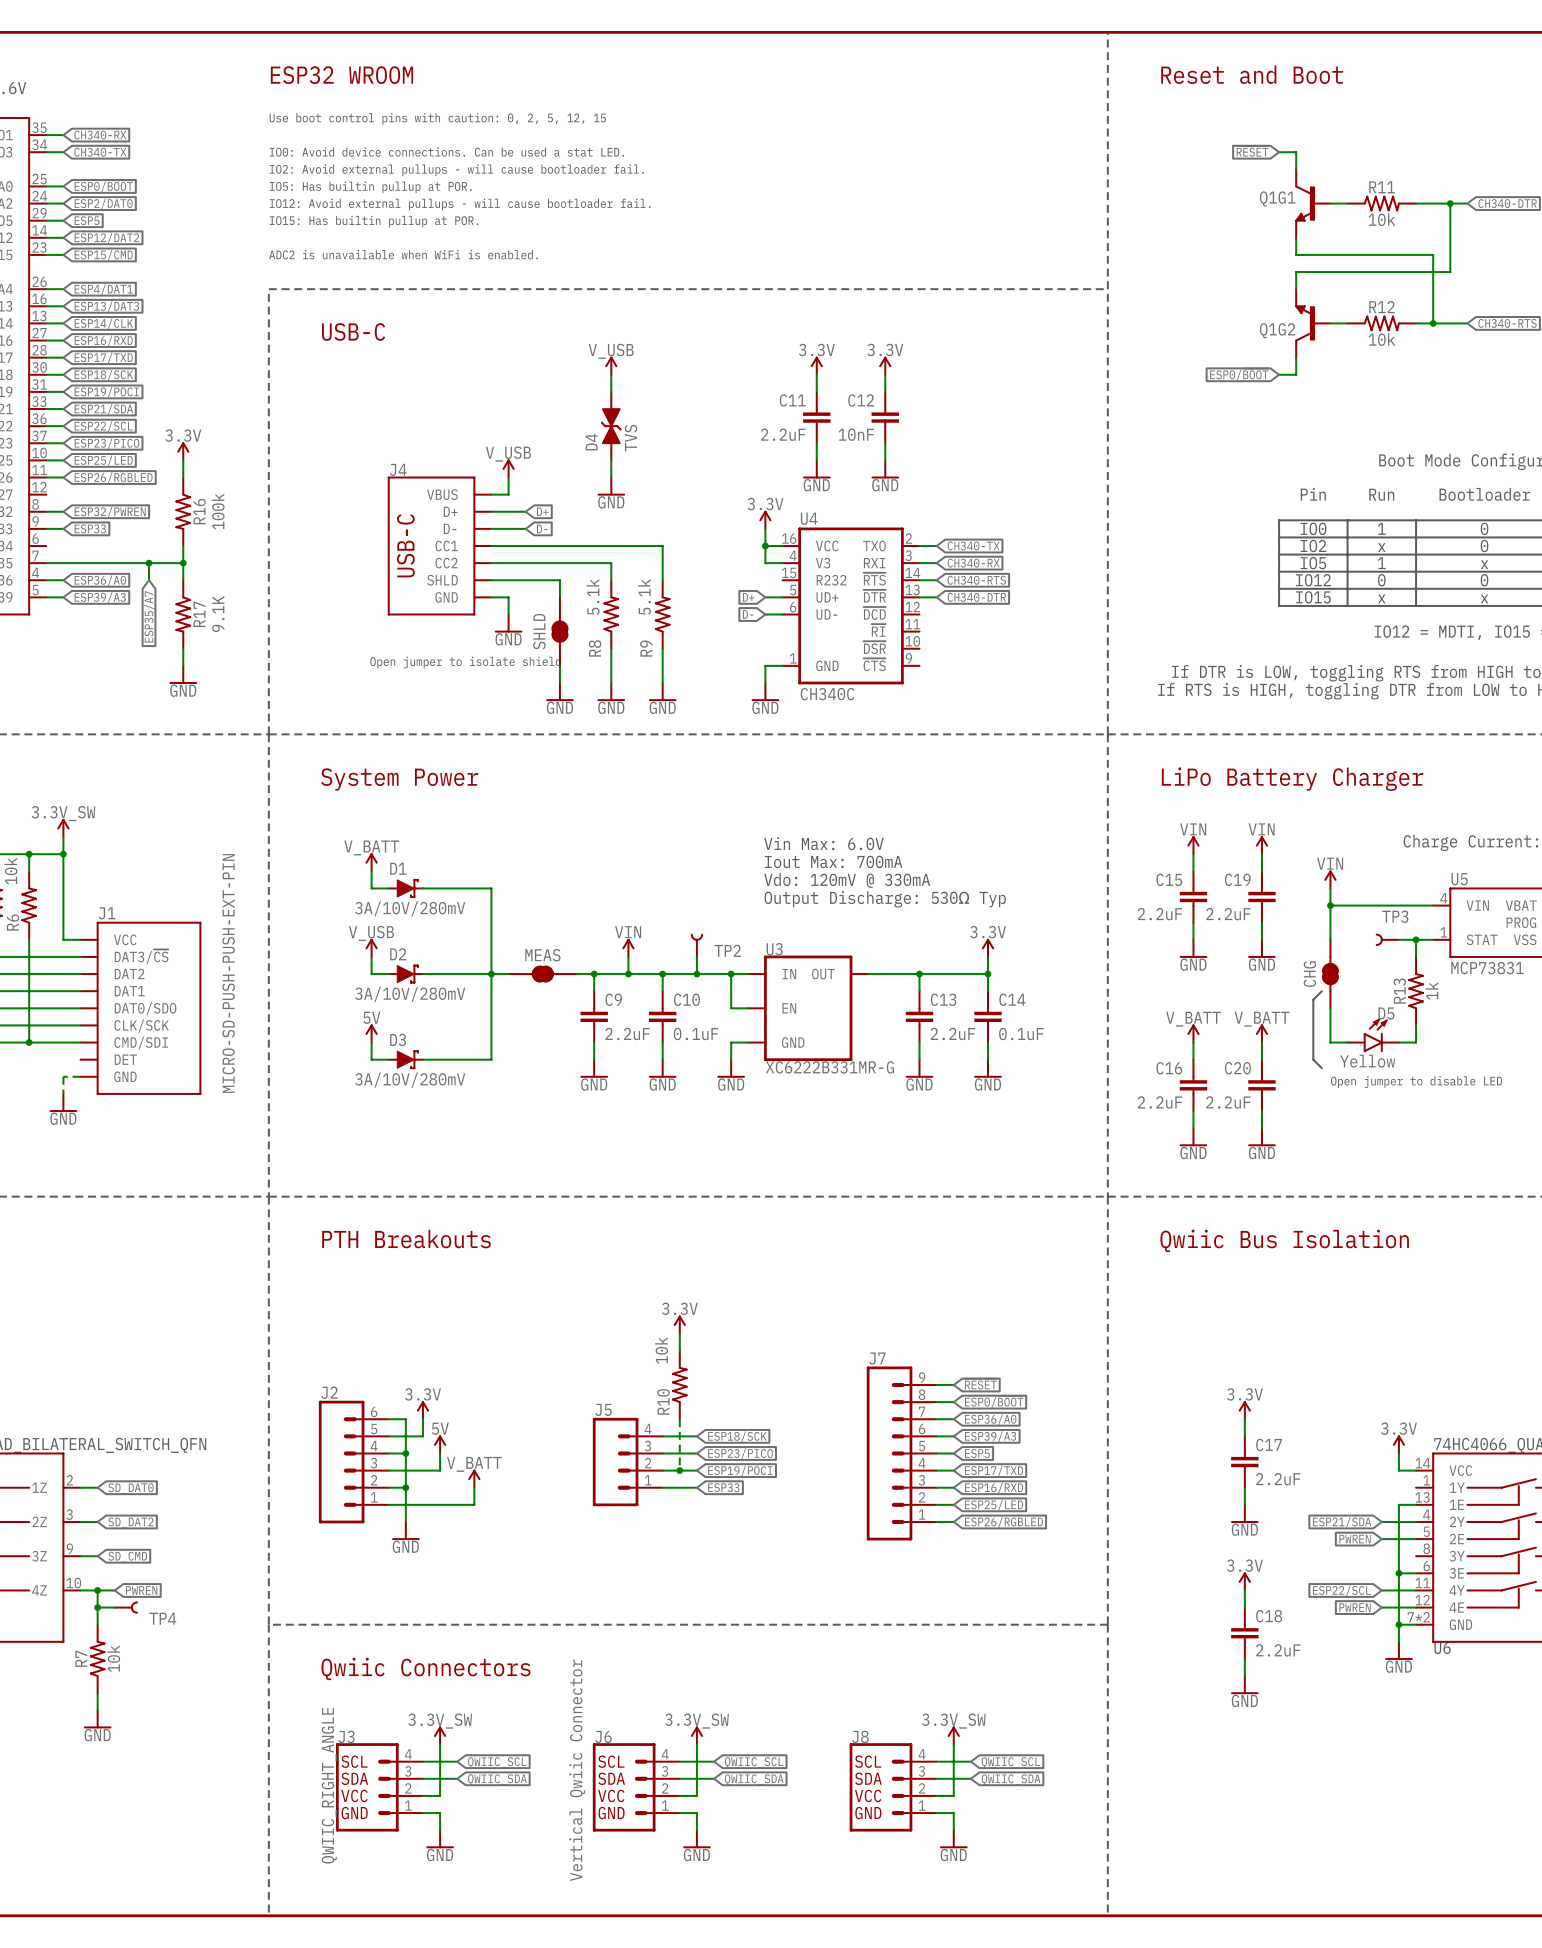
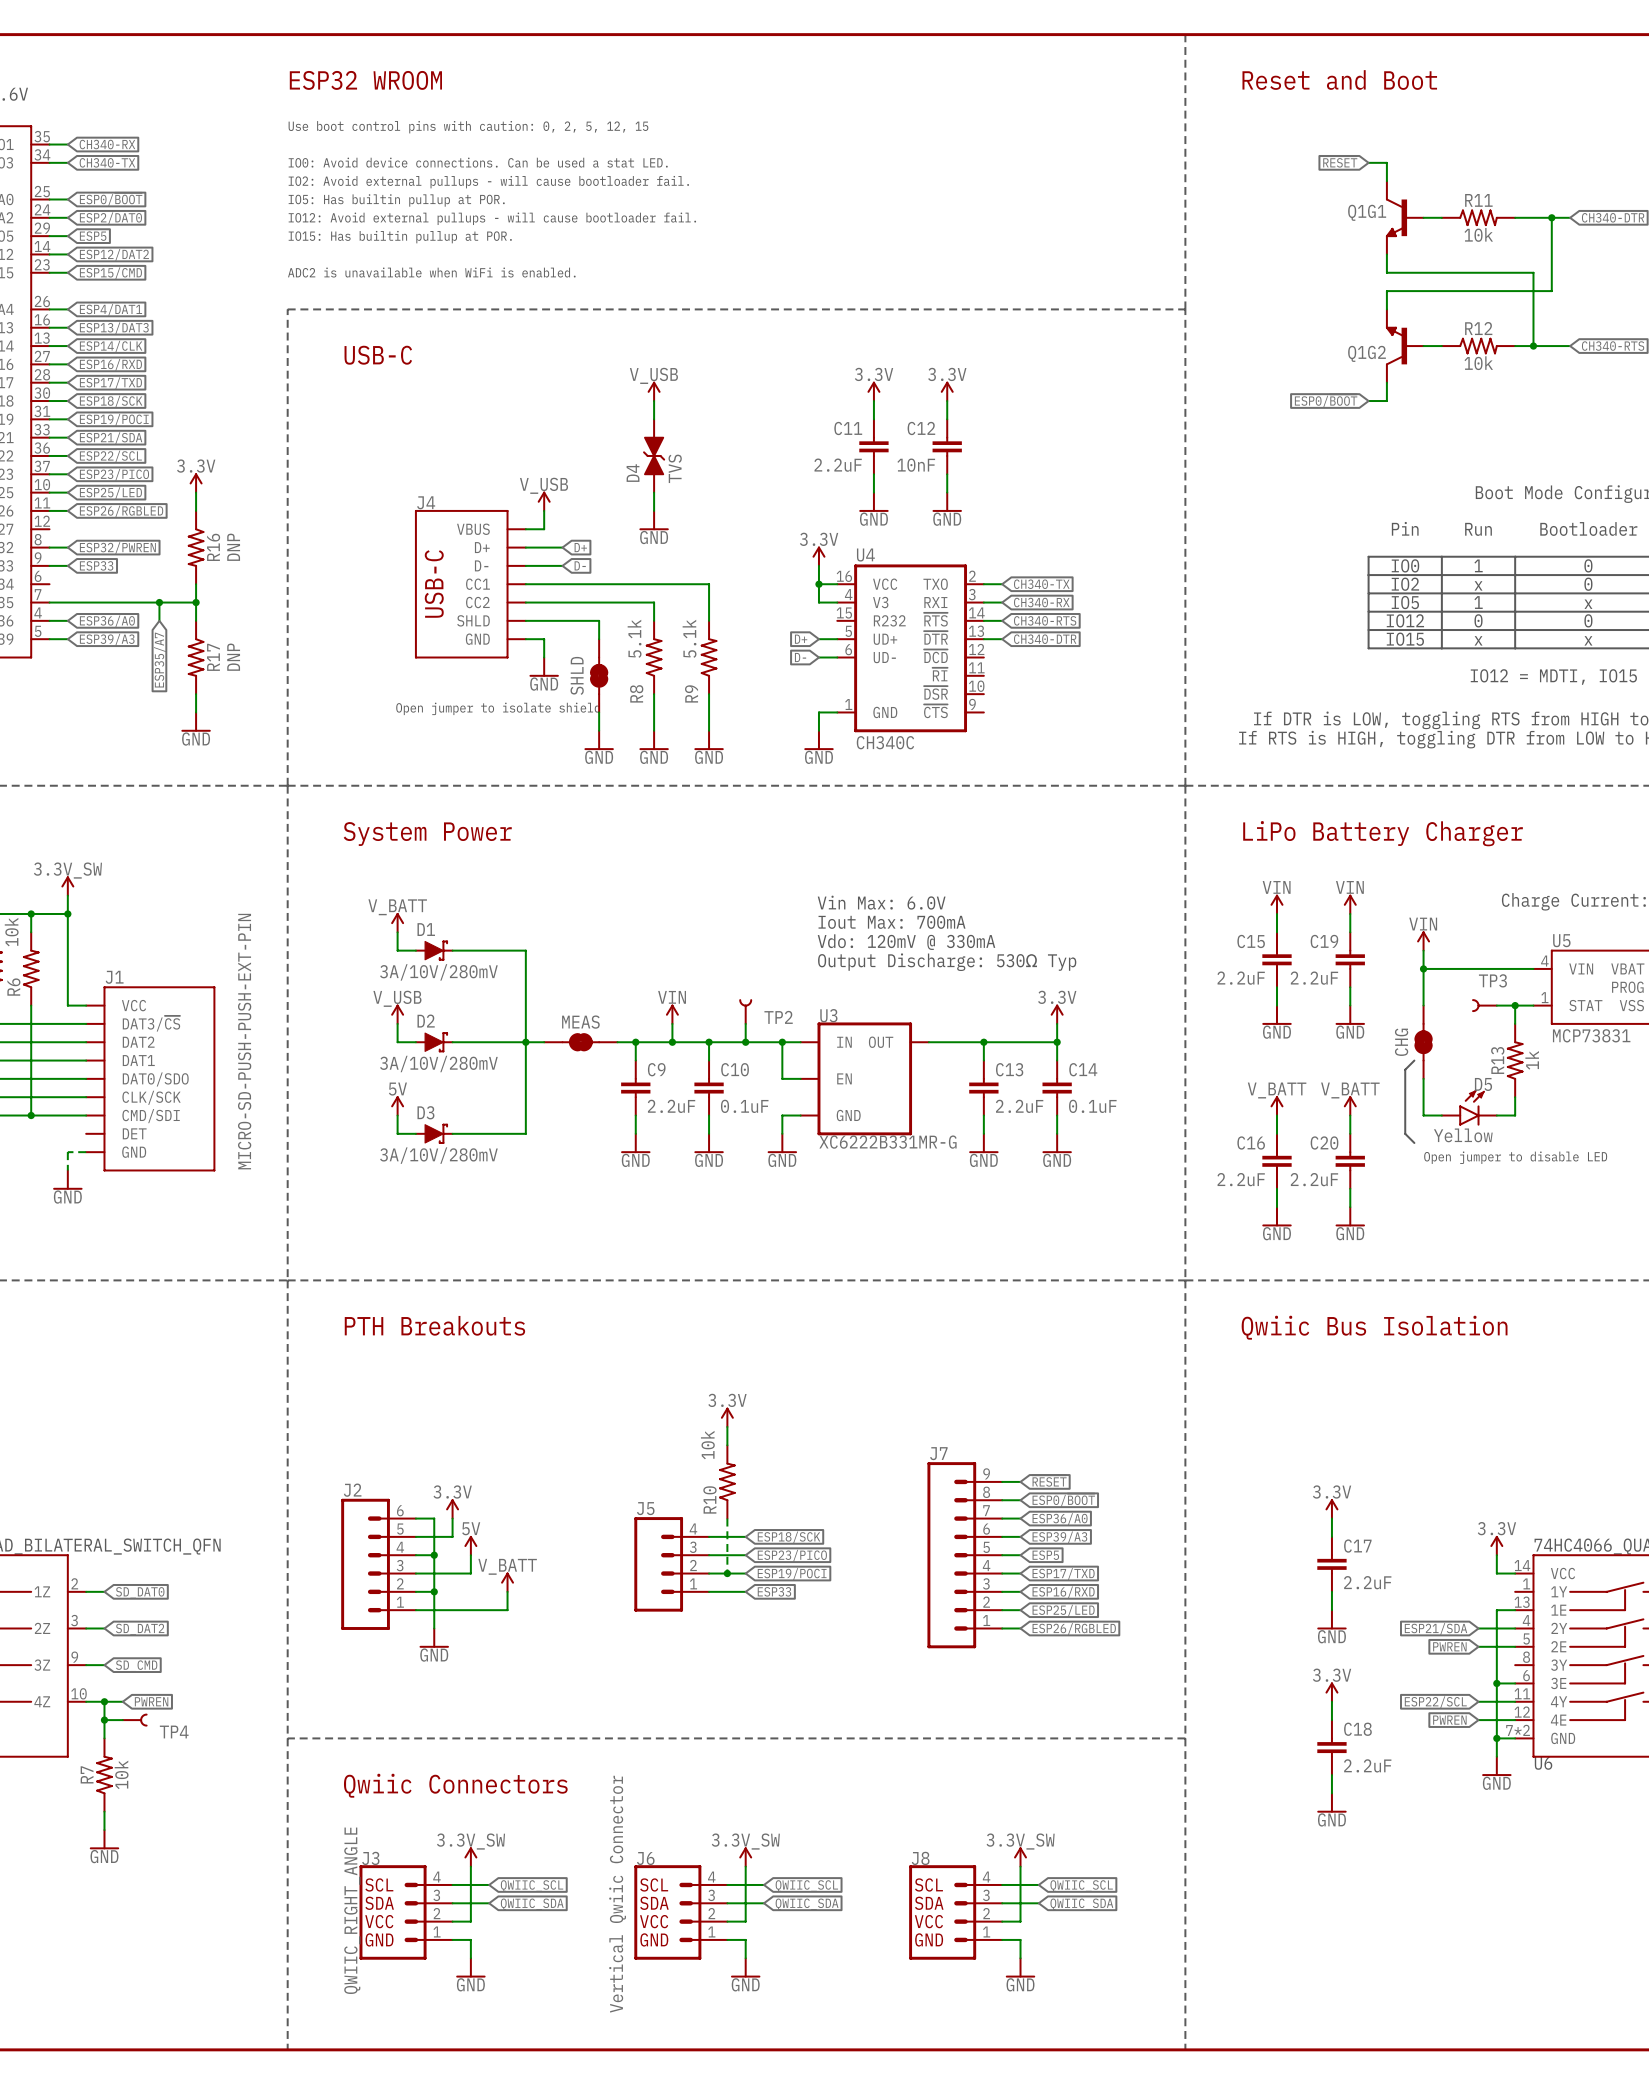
R16 value: 100k (218, 511) -> DNP (233, 547)
R17 value: 9.1K (218, 614) -> DNP (233, 657)

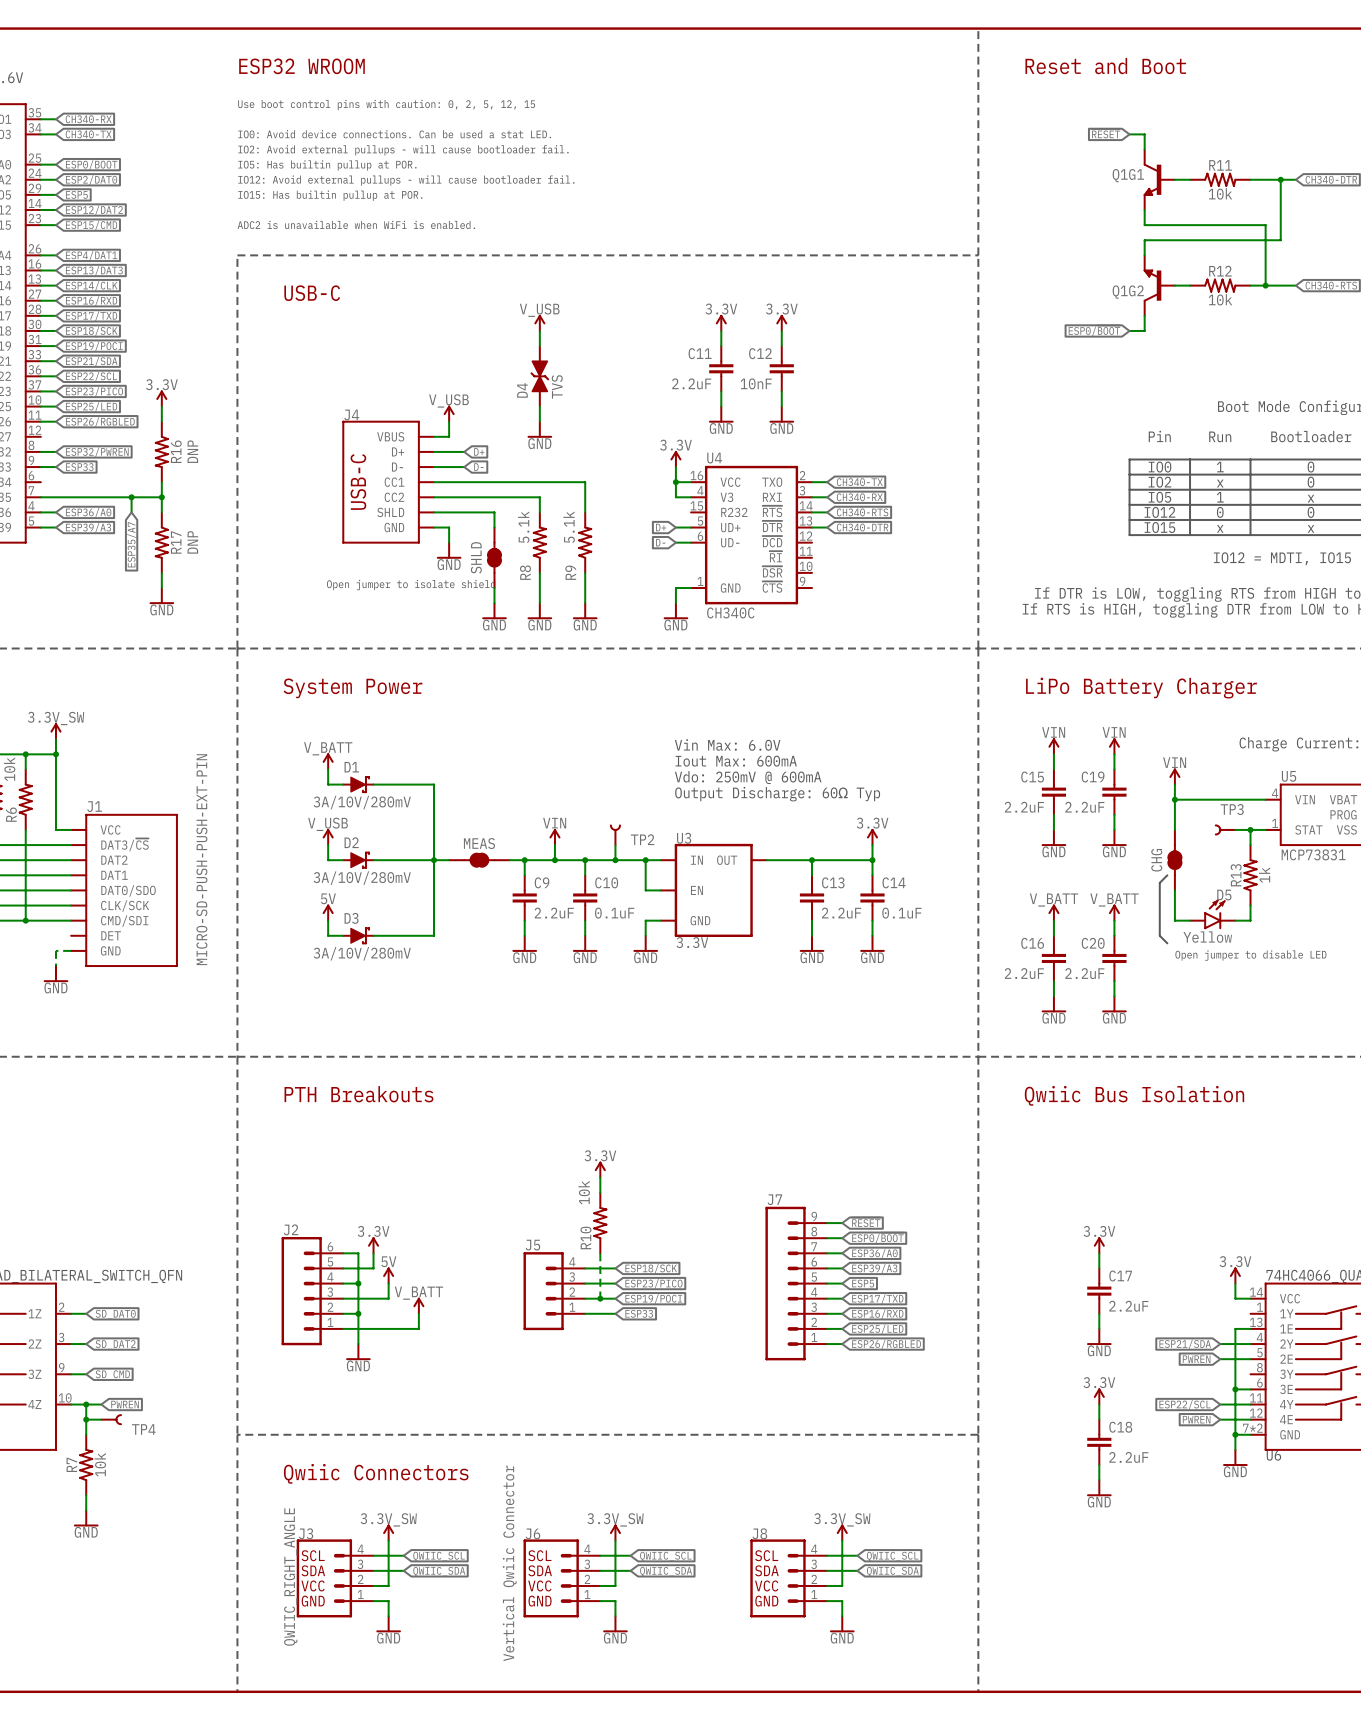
text: Iout Max: 700mA (892, 922) -> Iout Max: 600mA (736, 761)
text: Vdo: 120mV @ 330mA (906, 942) -> Vdo: 250mV @ 600mA (748, 777)
text: Output Discharge: 530Ω Typ (947, 962) -> Output Discharge: 60Ω Typ (777, 794)
U3 value: XC6222B331MR-G (888, 1142) -> 3.3V (692, 942)

